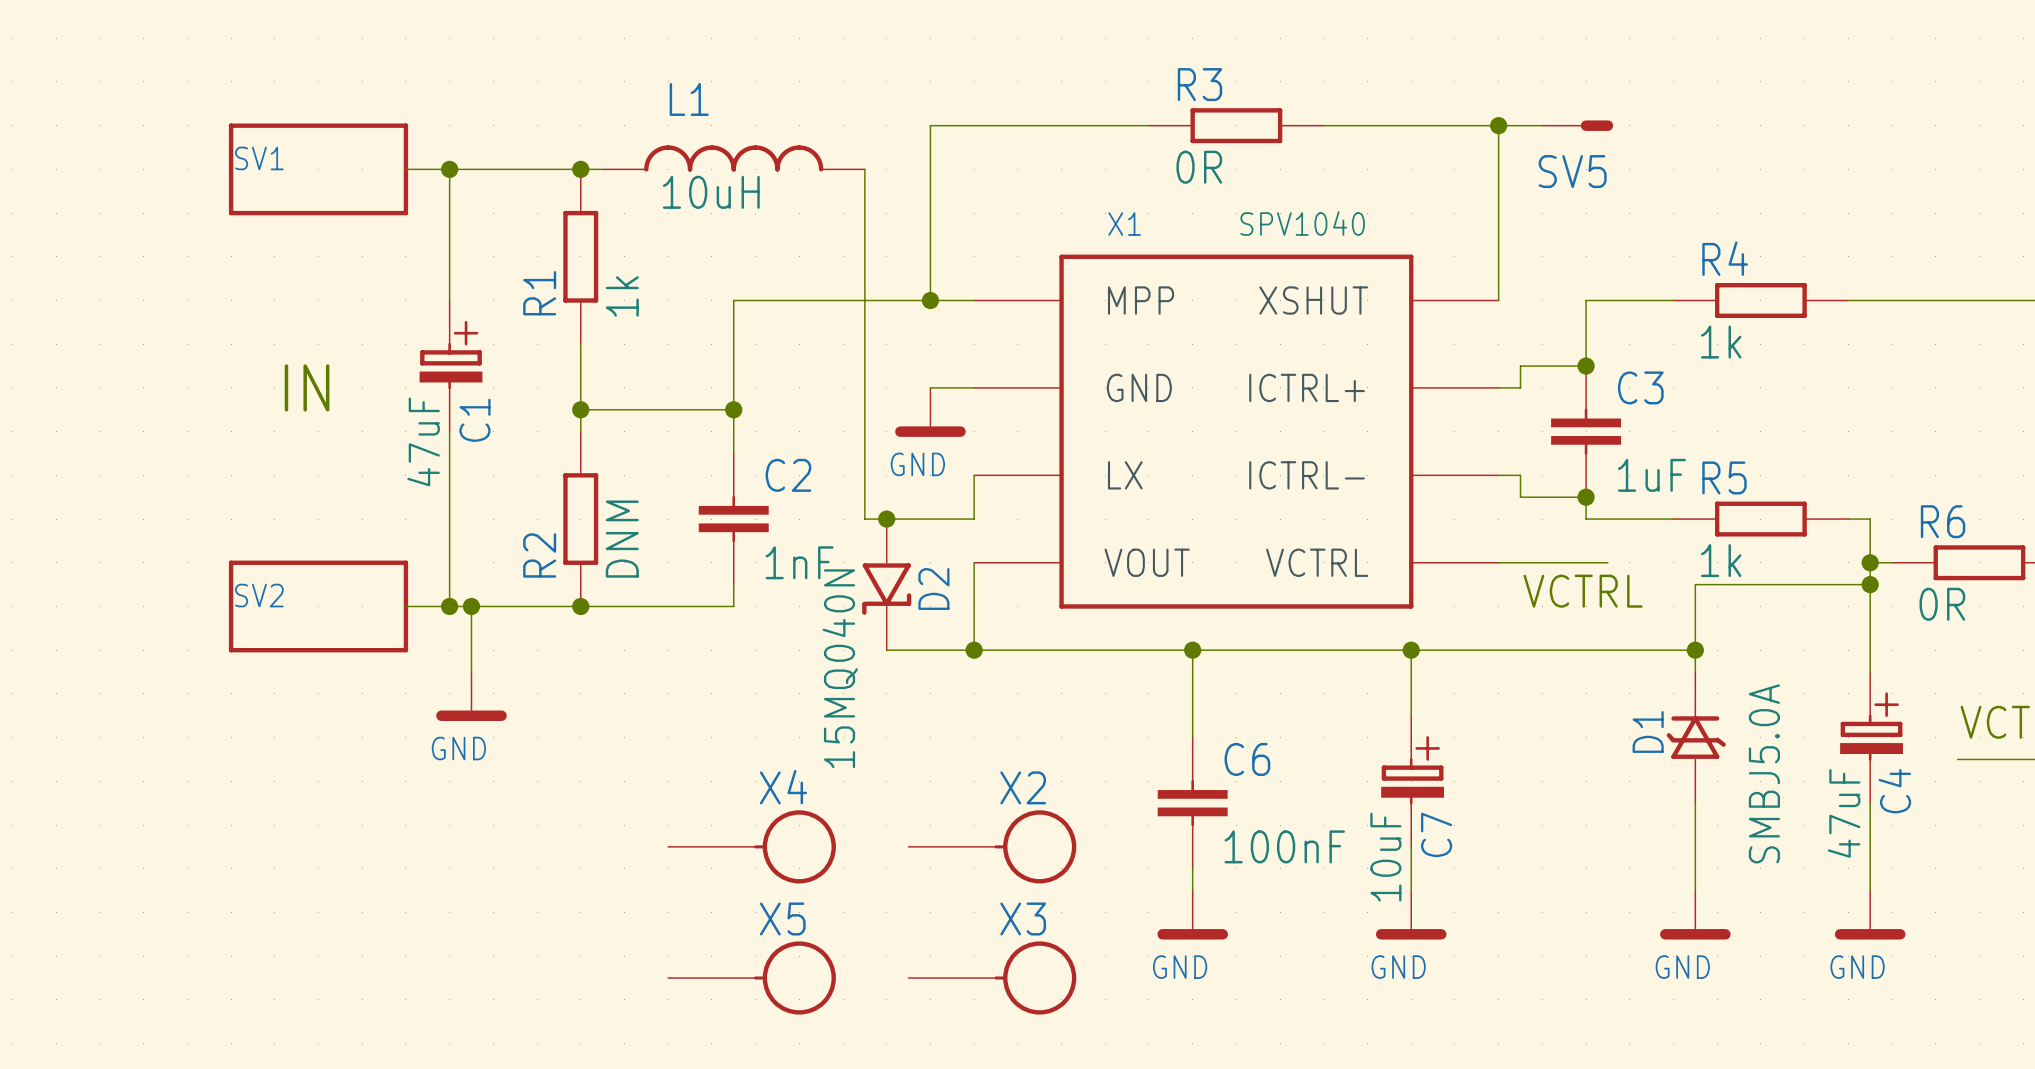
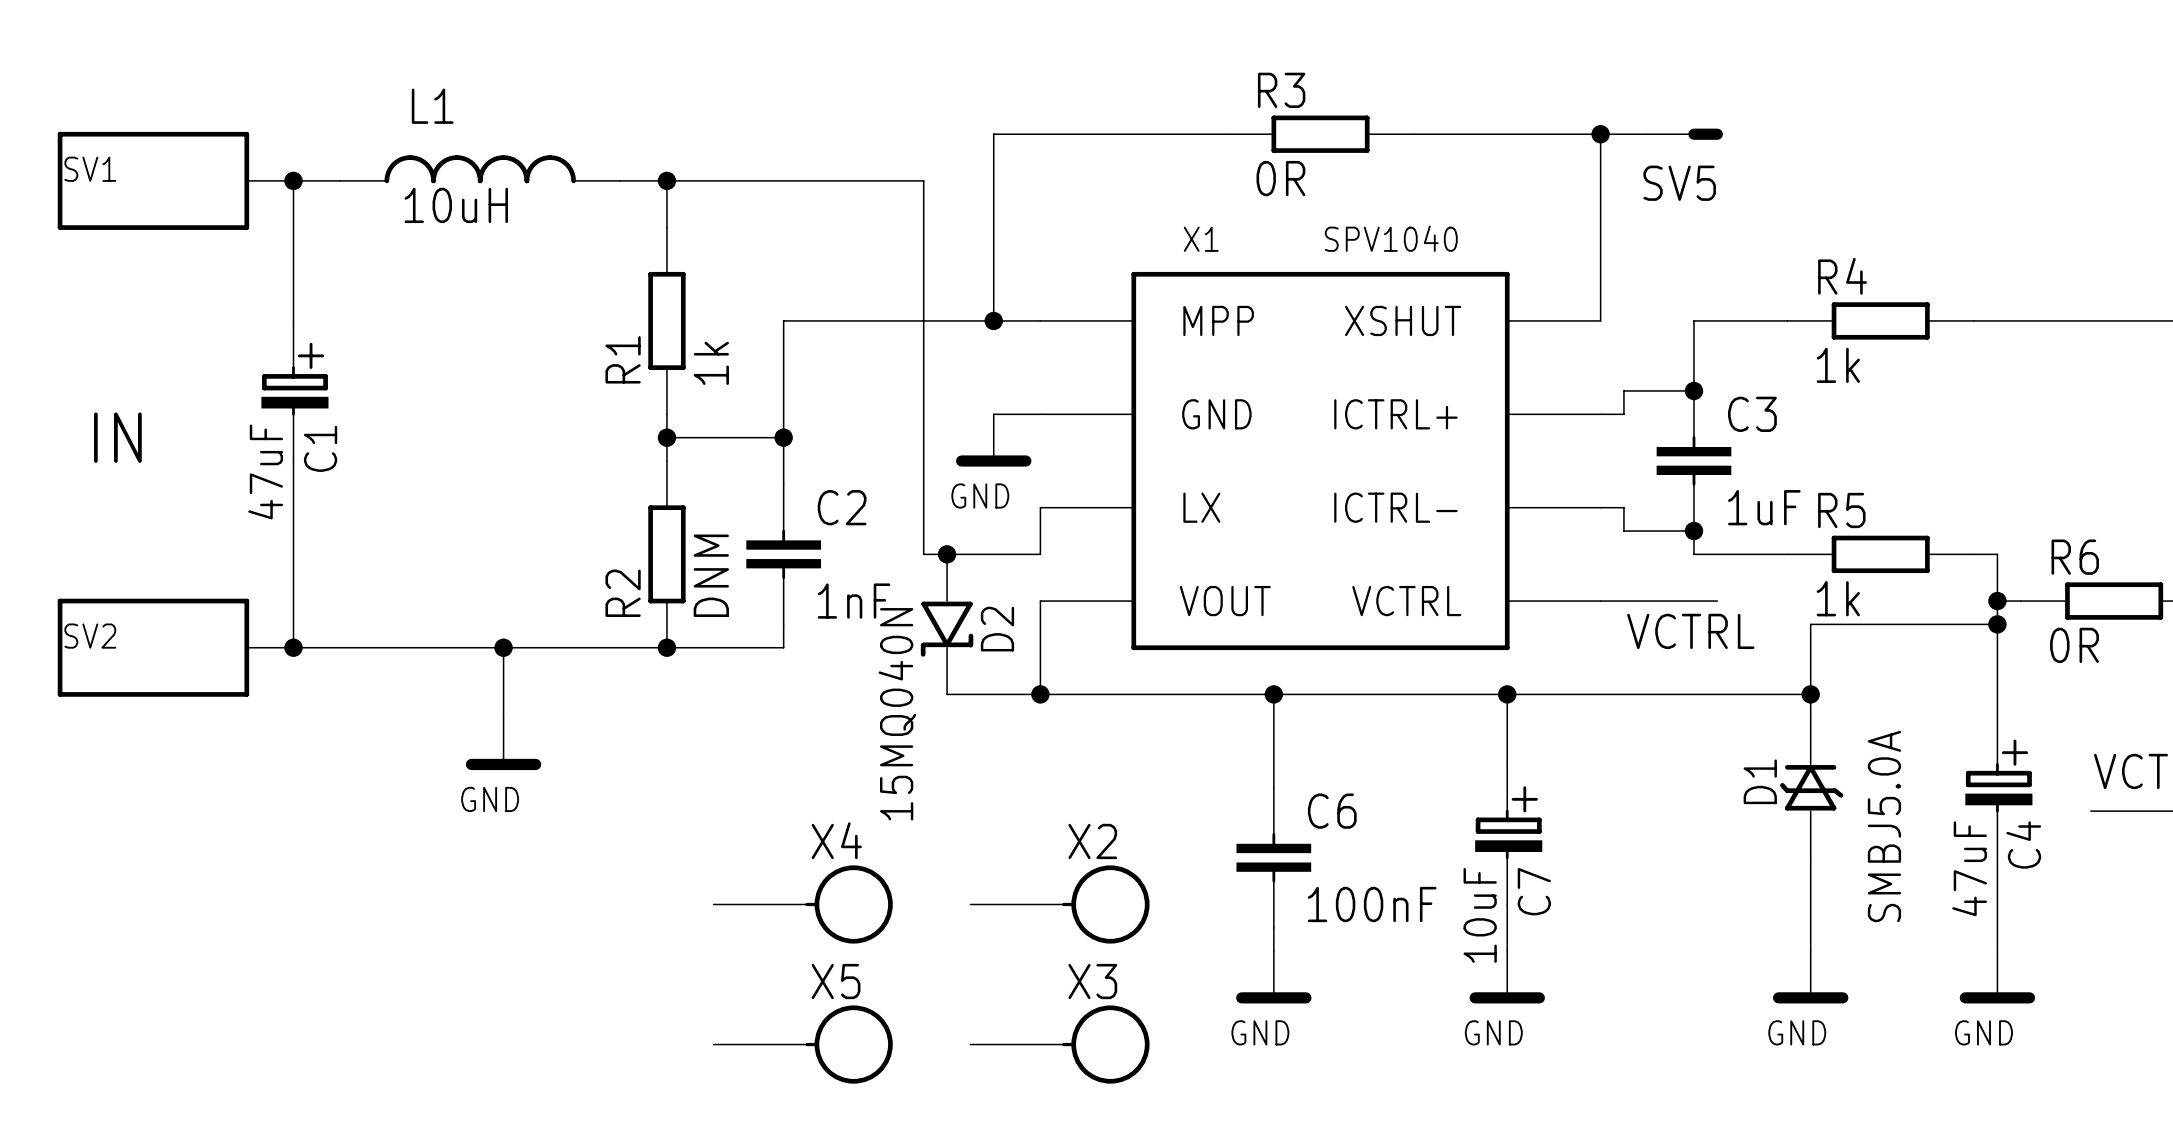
L1 position: (733, 158) -> (480, 169)
wire: none -> (246, 180) (340, 180)
junction: none -> (293, 180)
SV1 position: (318, 169) -> (153, 180)
wire: (405, 169) (580, 169) -> none
wire: (449, 169) (449, 300) -> (293, 180) (293, 320)
junction: (449, 169) -> none
junction position: (580, 169) -> (666, 180)
wire: none -> (643, 180) (923, 180)
wire: none -> (666, 180) (666, 227)
R1 position: (580, 256) -> (666, 320)
wire: (580, 344) (580, 431) -> none
C1 position: (450, 366) -> (294, 390)
text position: IN (307, 387) -> IN (117, 437)
wire: none -> (666, 414) (666, 461)
wire: (580, 409) (624, 409) -> none
junction position: (580, 409) -> (666, 437)
wire: (449, 431) (449, 606) -> (293, 461) (293, 647)
R2 position: (580, 519) -> (666, 554)
wire: none -> (246, 647) (433, 647)
junction: none -> (293, 647)
SV2 position: (318, 606) -> (153, 647)
junction: (449, 606) -> none
junction position: (580, 606) -> (666, 647)

